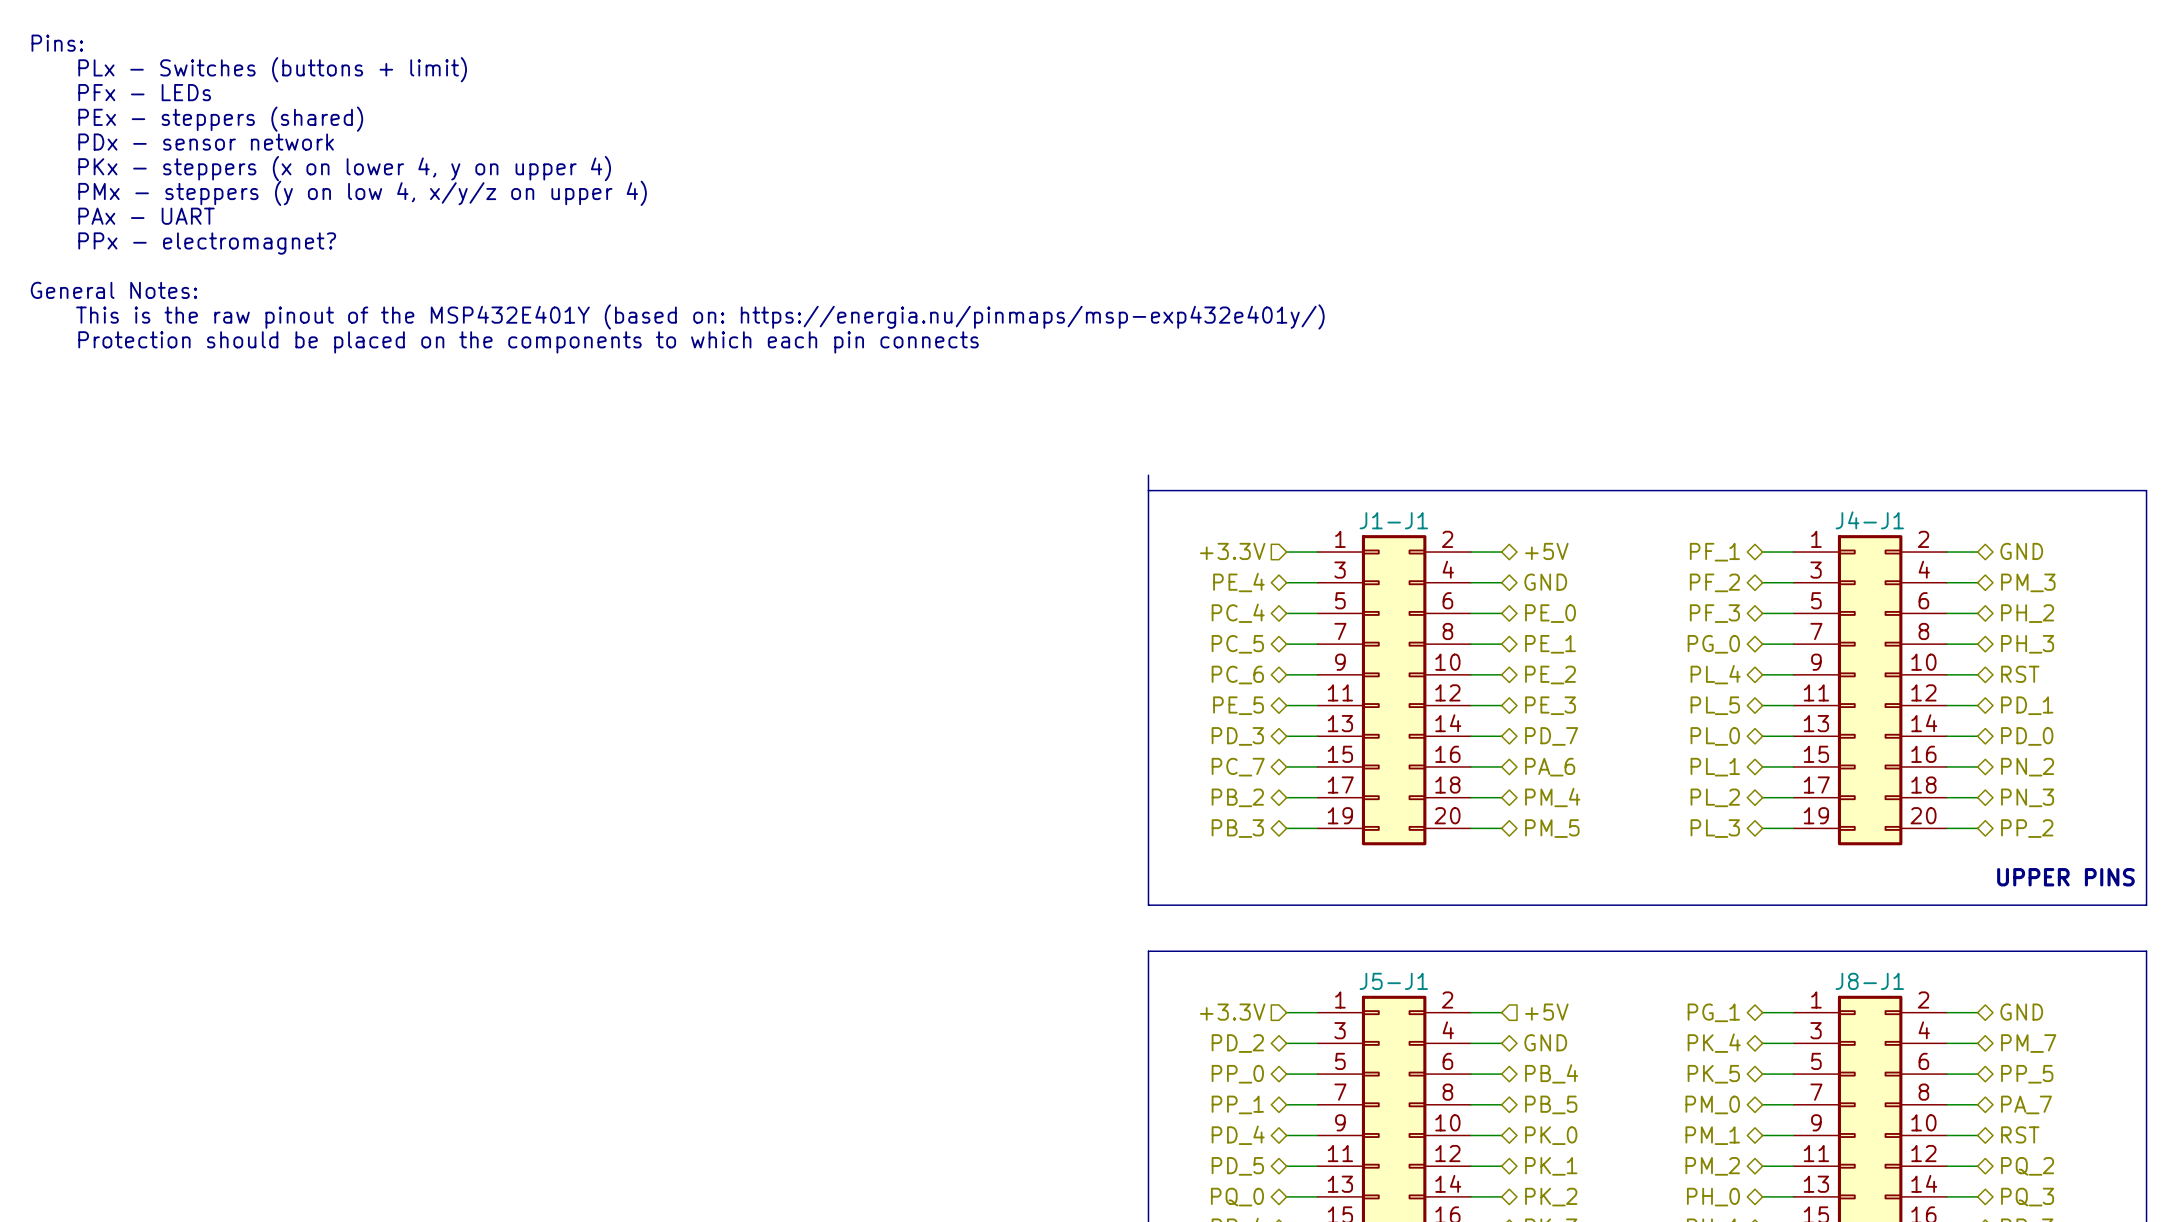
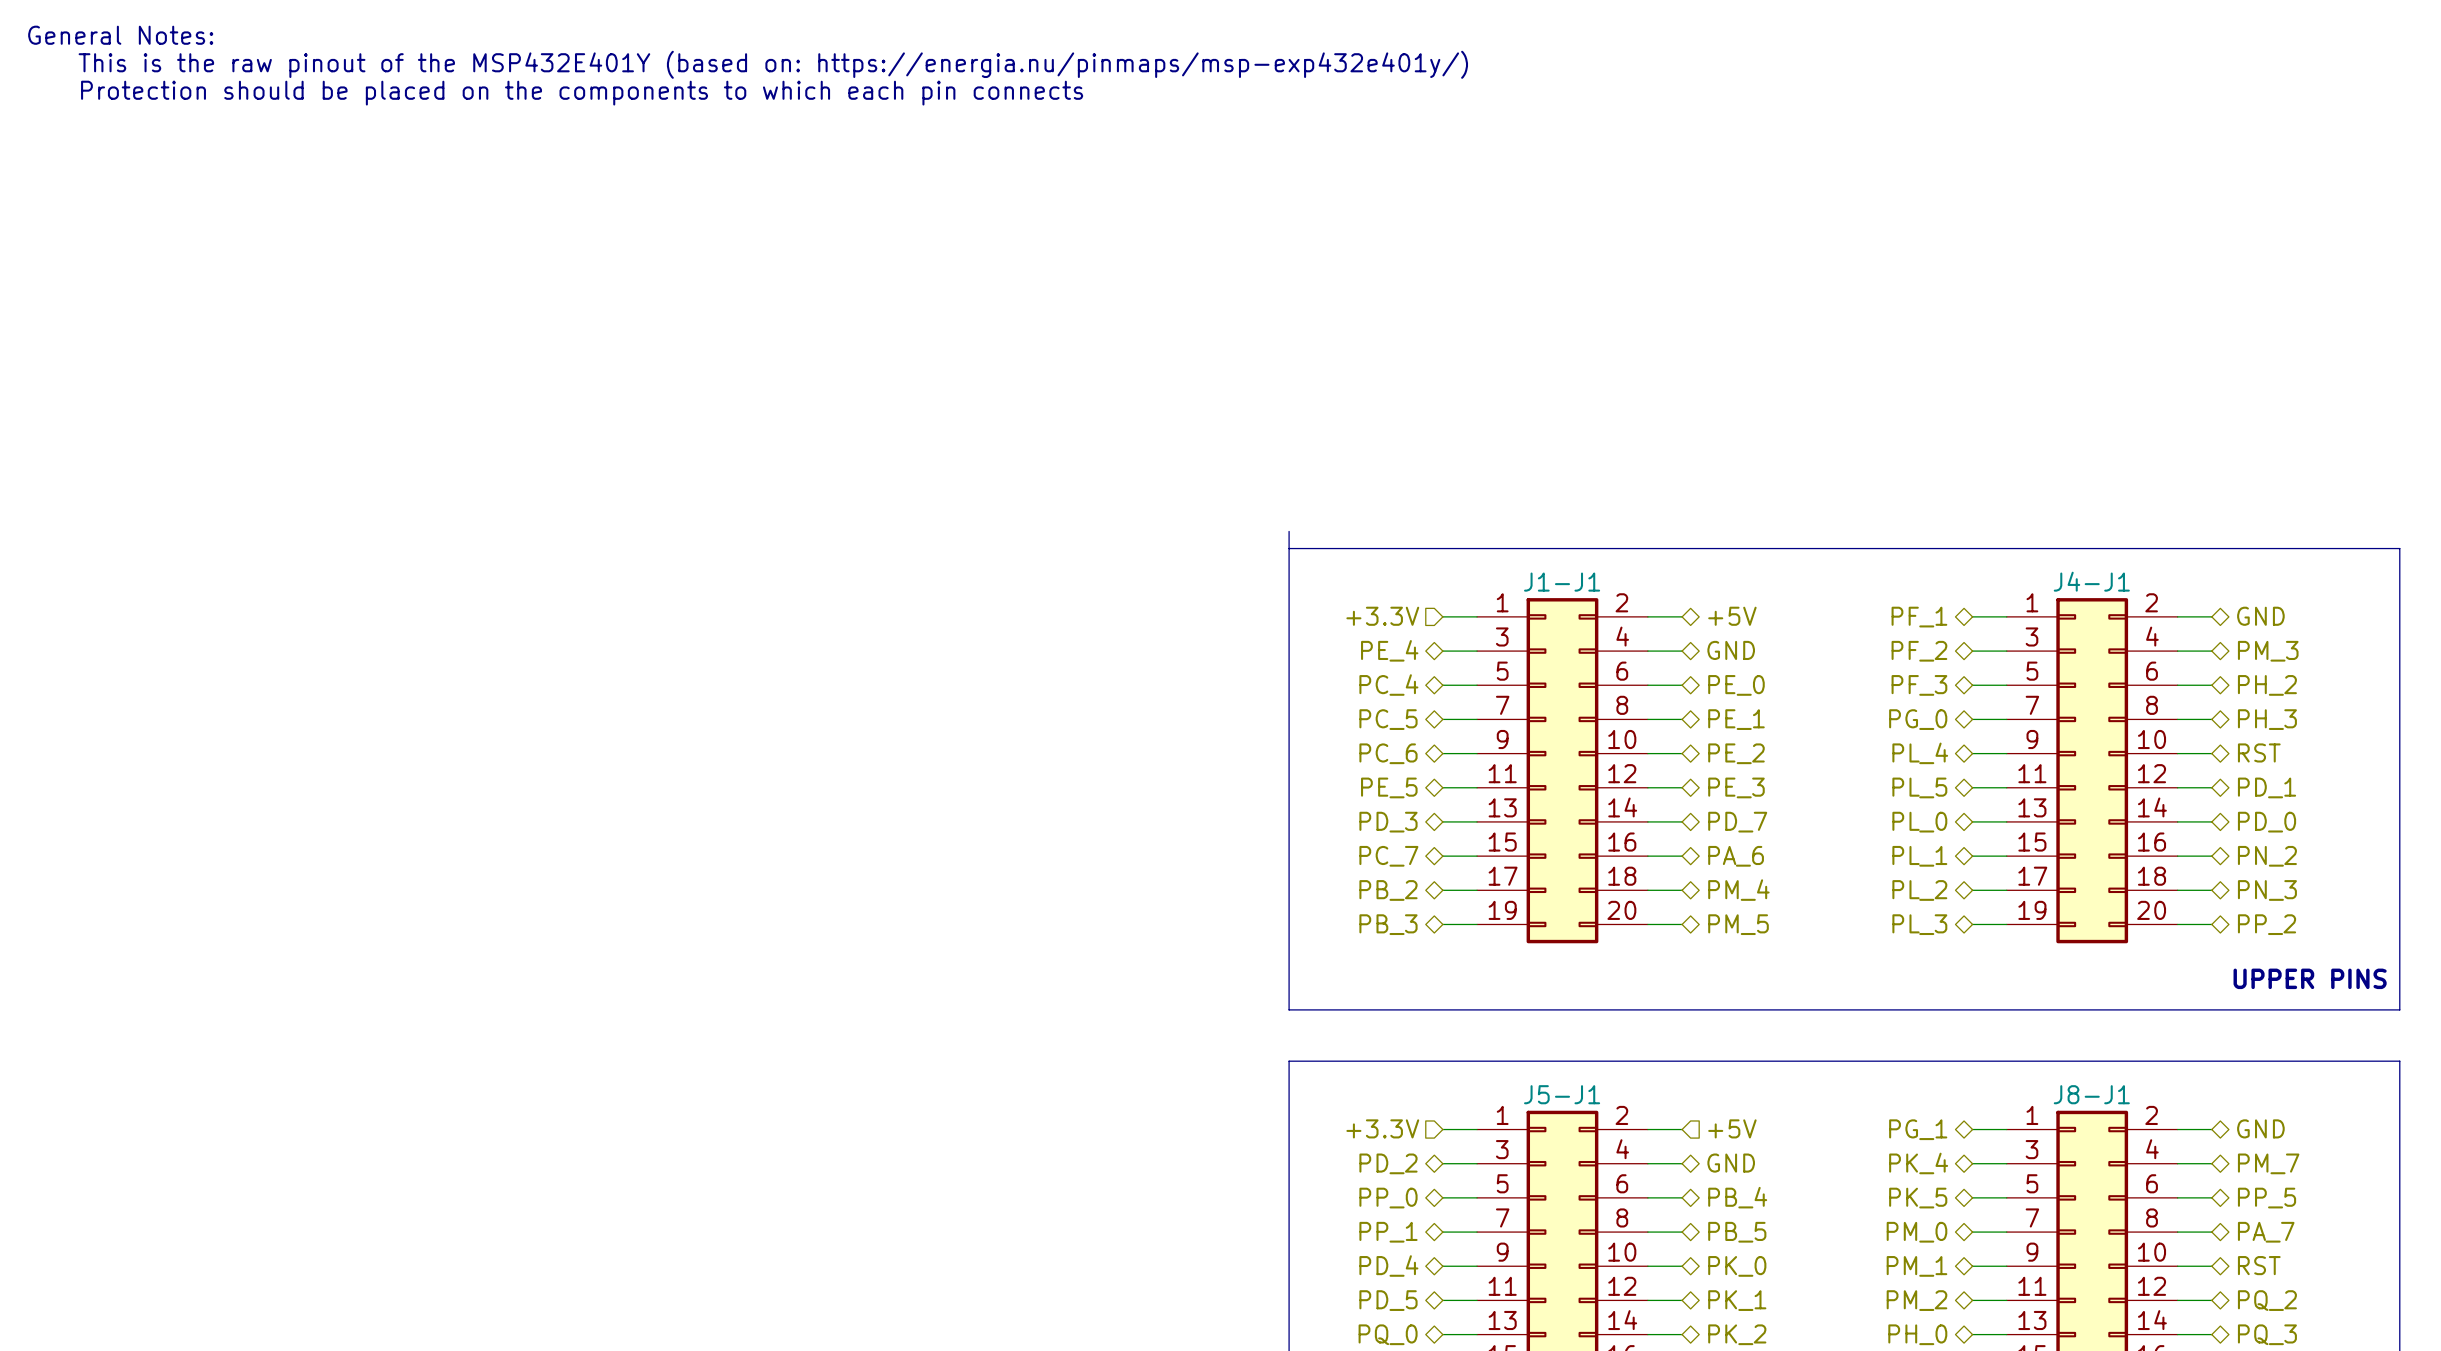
text: Pins: (57, 43) -> none
text: PLx - Switches (buttons + limit) (272, 69) -> none
text: PFx - LEDs (144, 92) -> none
text: PEx - steppers (shared) (220, 119) -> none
text: PDx - sensor network (206, 142) -> none
text: PKx - steppers (x on lower 4, y on upper 4) (344, 168) -> none
text: PMx - steppers (y on low 4, x/y/z on upper 4) (362, 193) -> none
text: PAx - UART (146, 216) -> none
text: PPx - electromagnet? (207, 243) -> none
text position: General Notes: (113, 290) -> General Notes: (120, 35)
text position: This is the raw pinout of the MSP432E401Y (based on: https://energia.nu/pinmaps/msp-exp432e401y/) (700, 316) -> This is the raw pinout of the MSP432E401Y (based on: https://energia.nu/pinmaps/msp-exp432e401y/) (773, 64)
text position: Protection should be placed on the components to which each pin connects (528, 342) -> Protection should be placed on the components to which each pin connects (582, 93)

